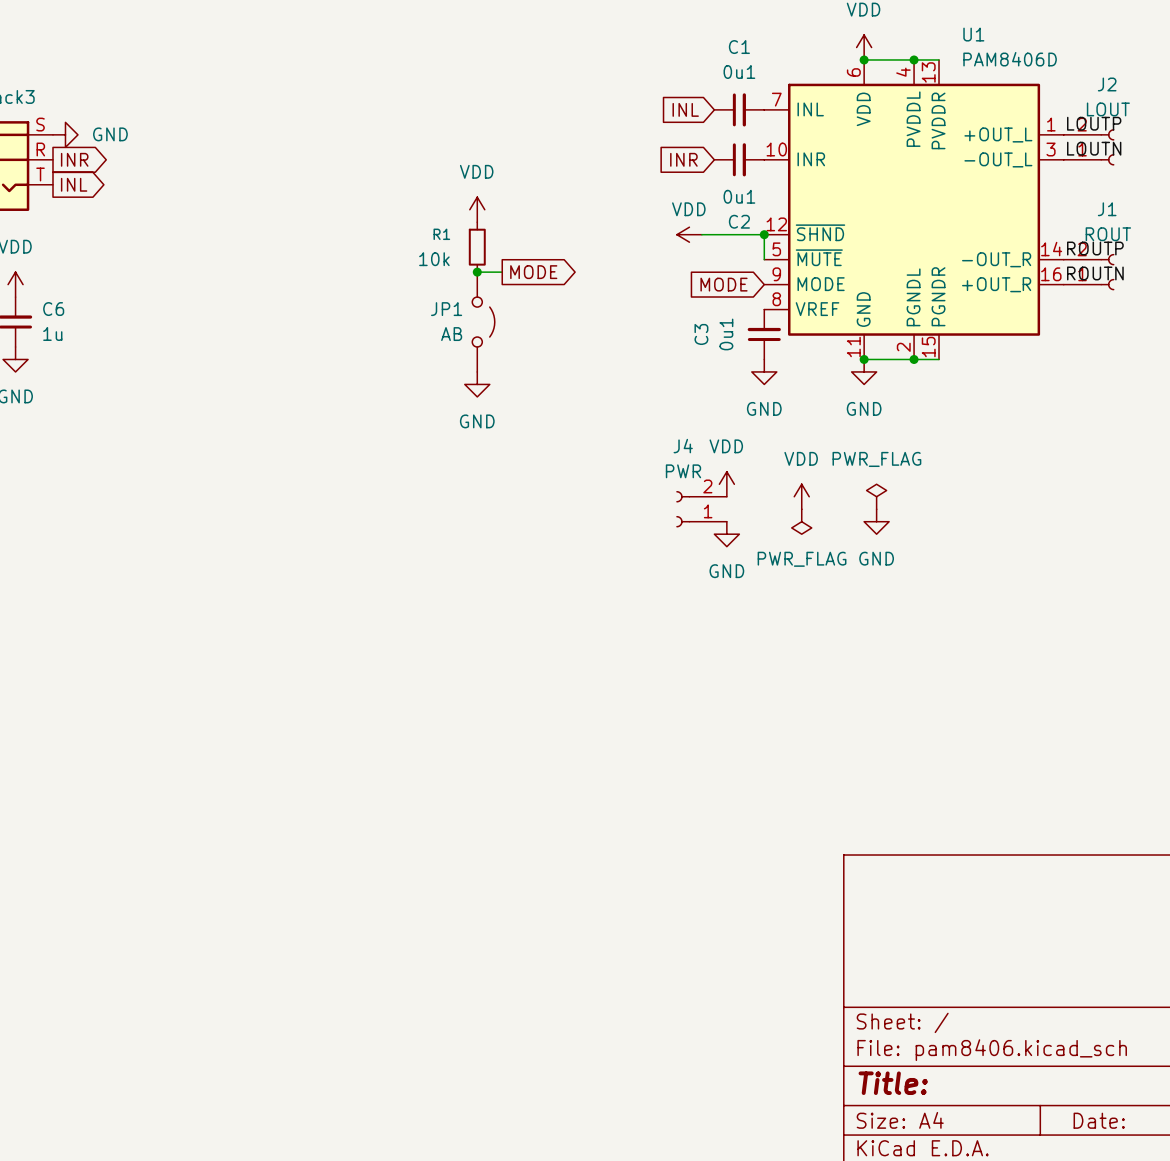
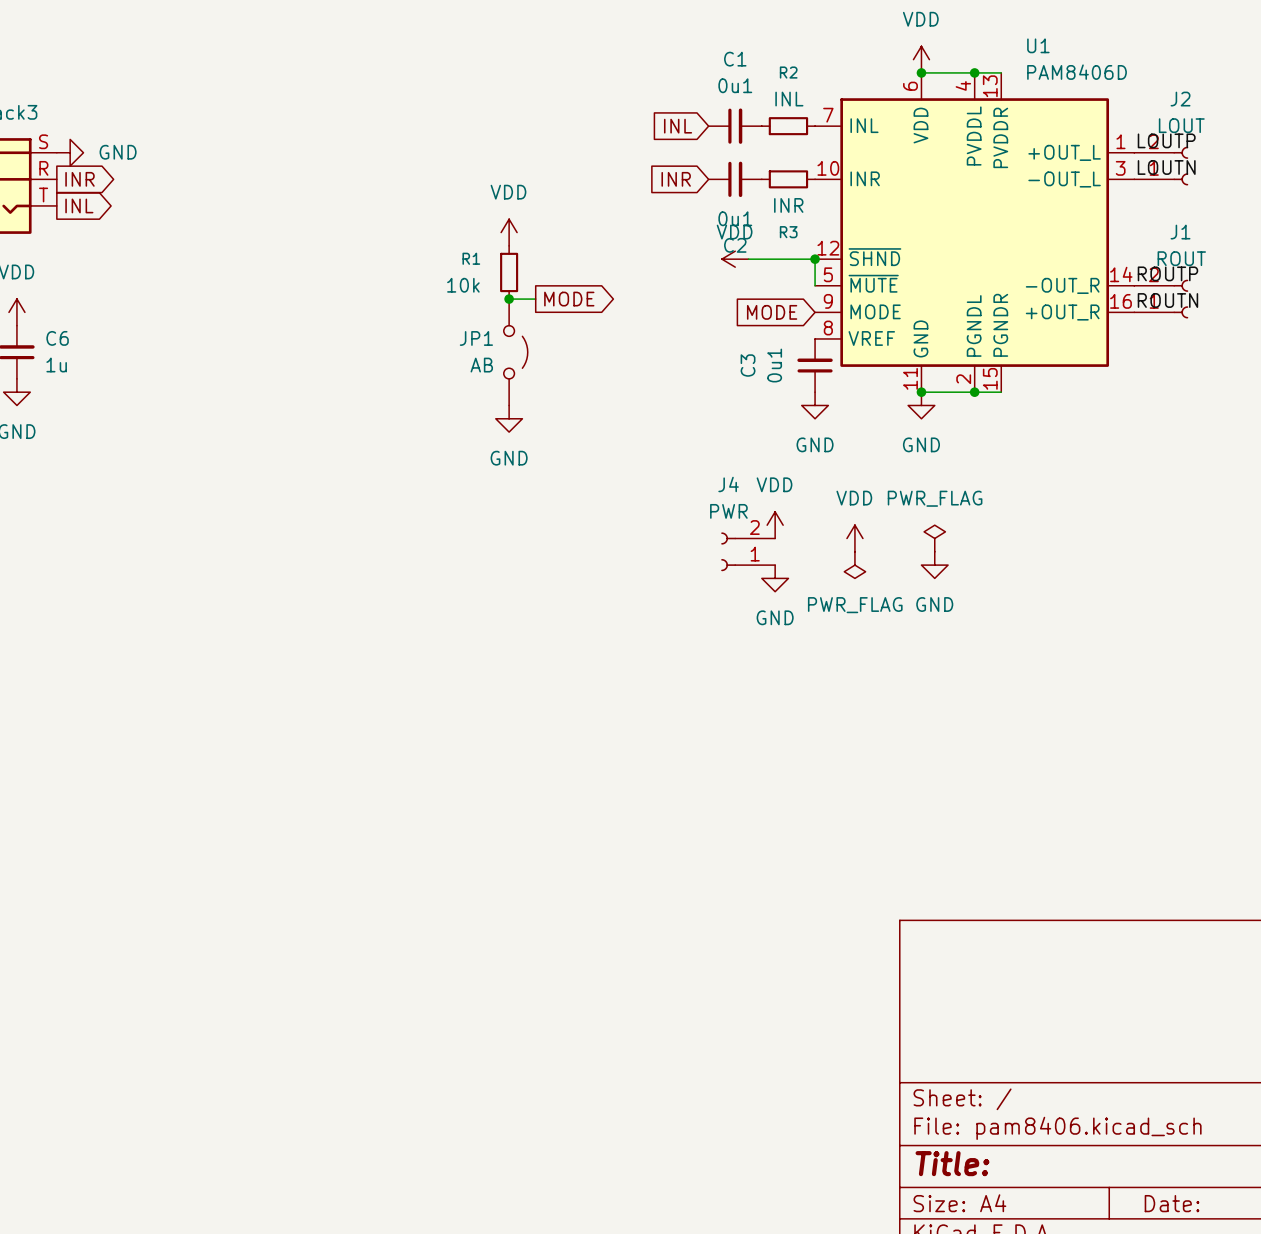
global label position: INL (685, 109) -> INL (678, 126)
C1 position: (739, 109) -> (735, 126)
R2: none -> INL (788, 126)
global label position: INR (683, 159) -> INR (676, 179)
C2 position: (739, 159) -> (735, 179)
R3: none -> INR (788, 179)

